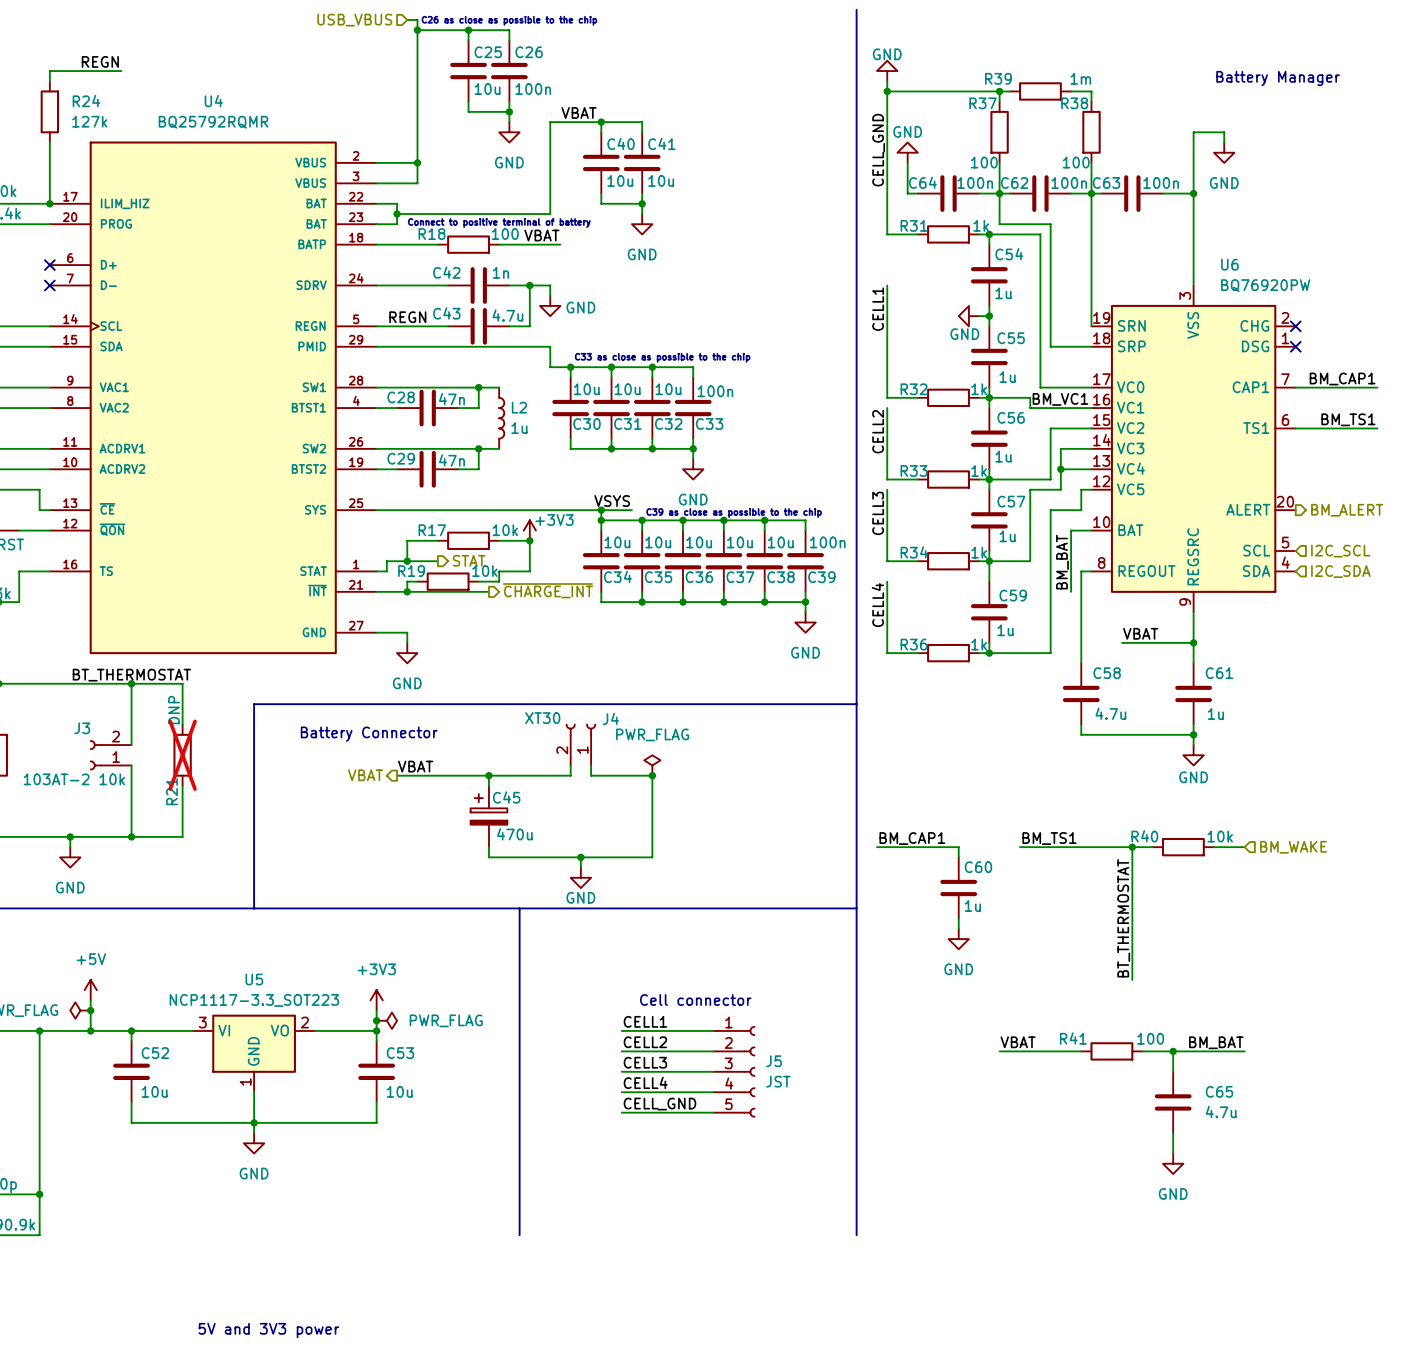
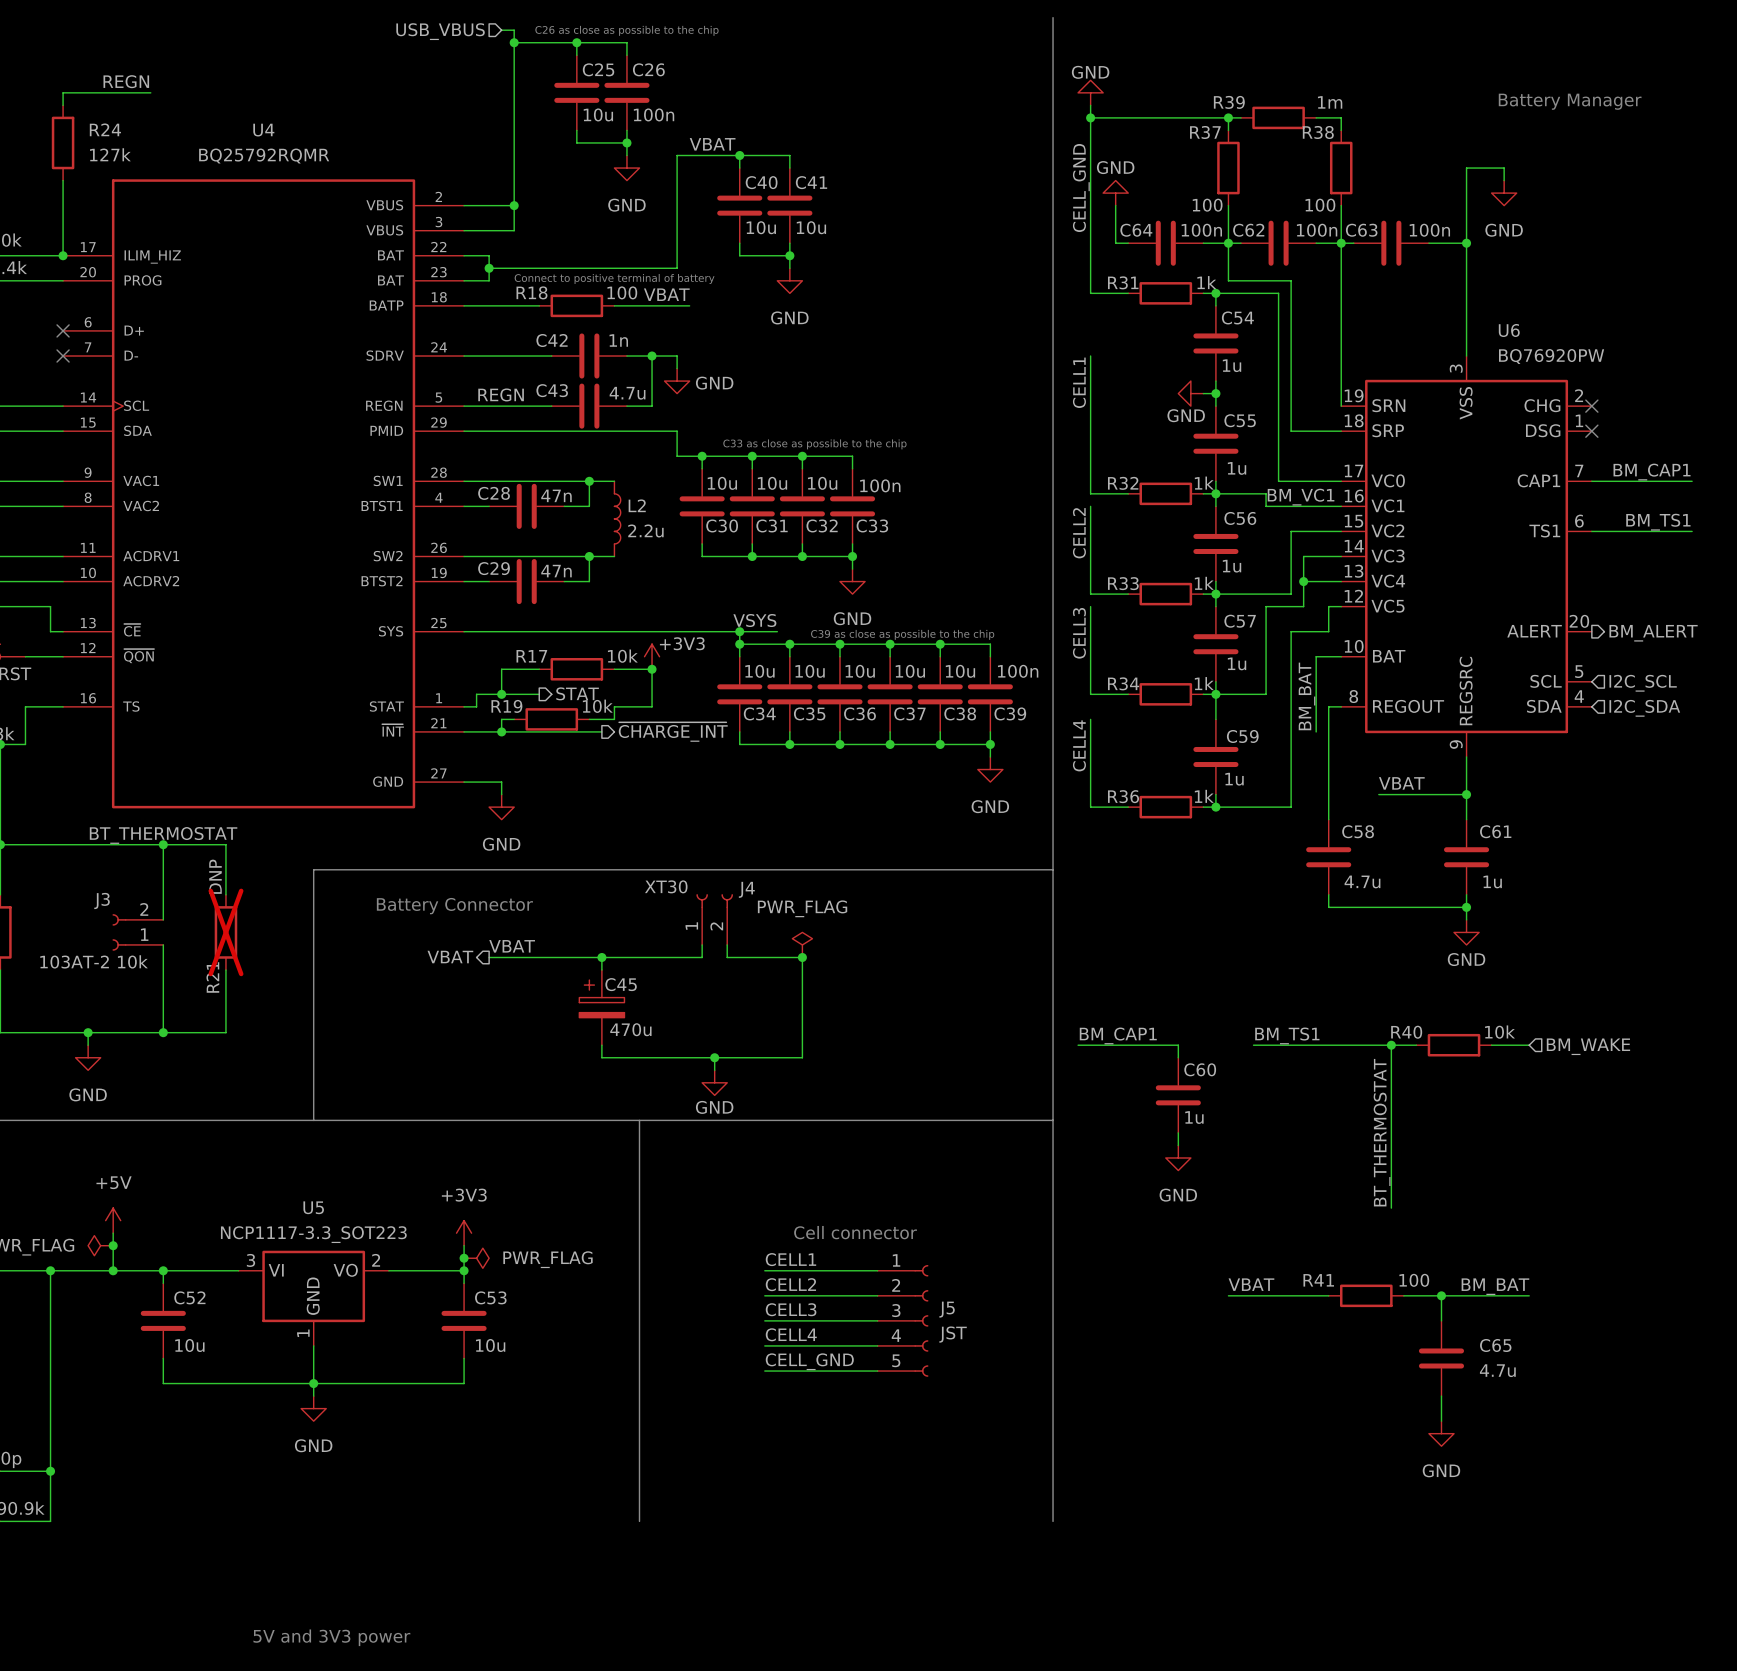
L2 value: 1u (519, 428) -> 2.2u (645, 530)
J4 flip: as is (580, 729) -> left-right (714, 901)

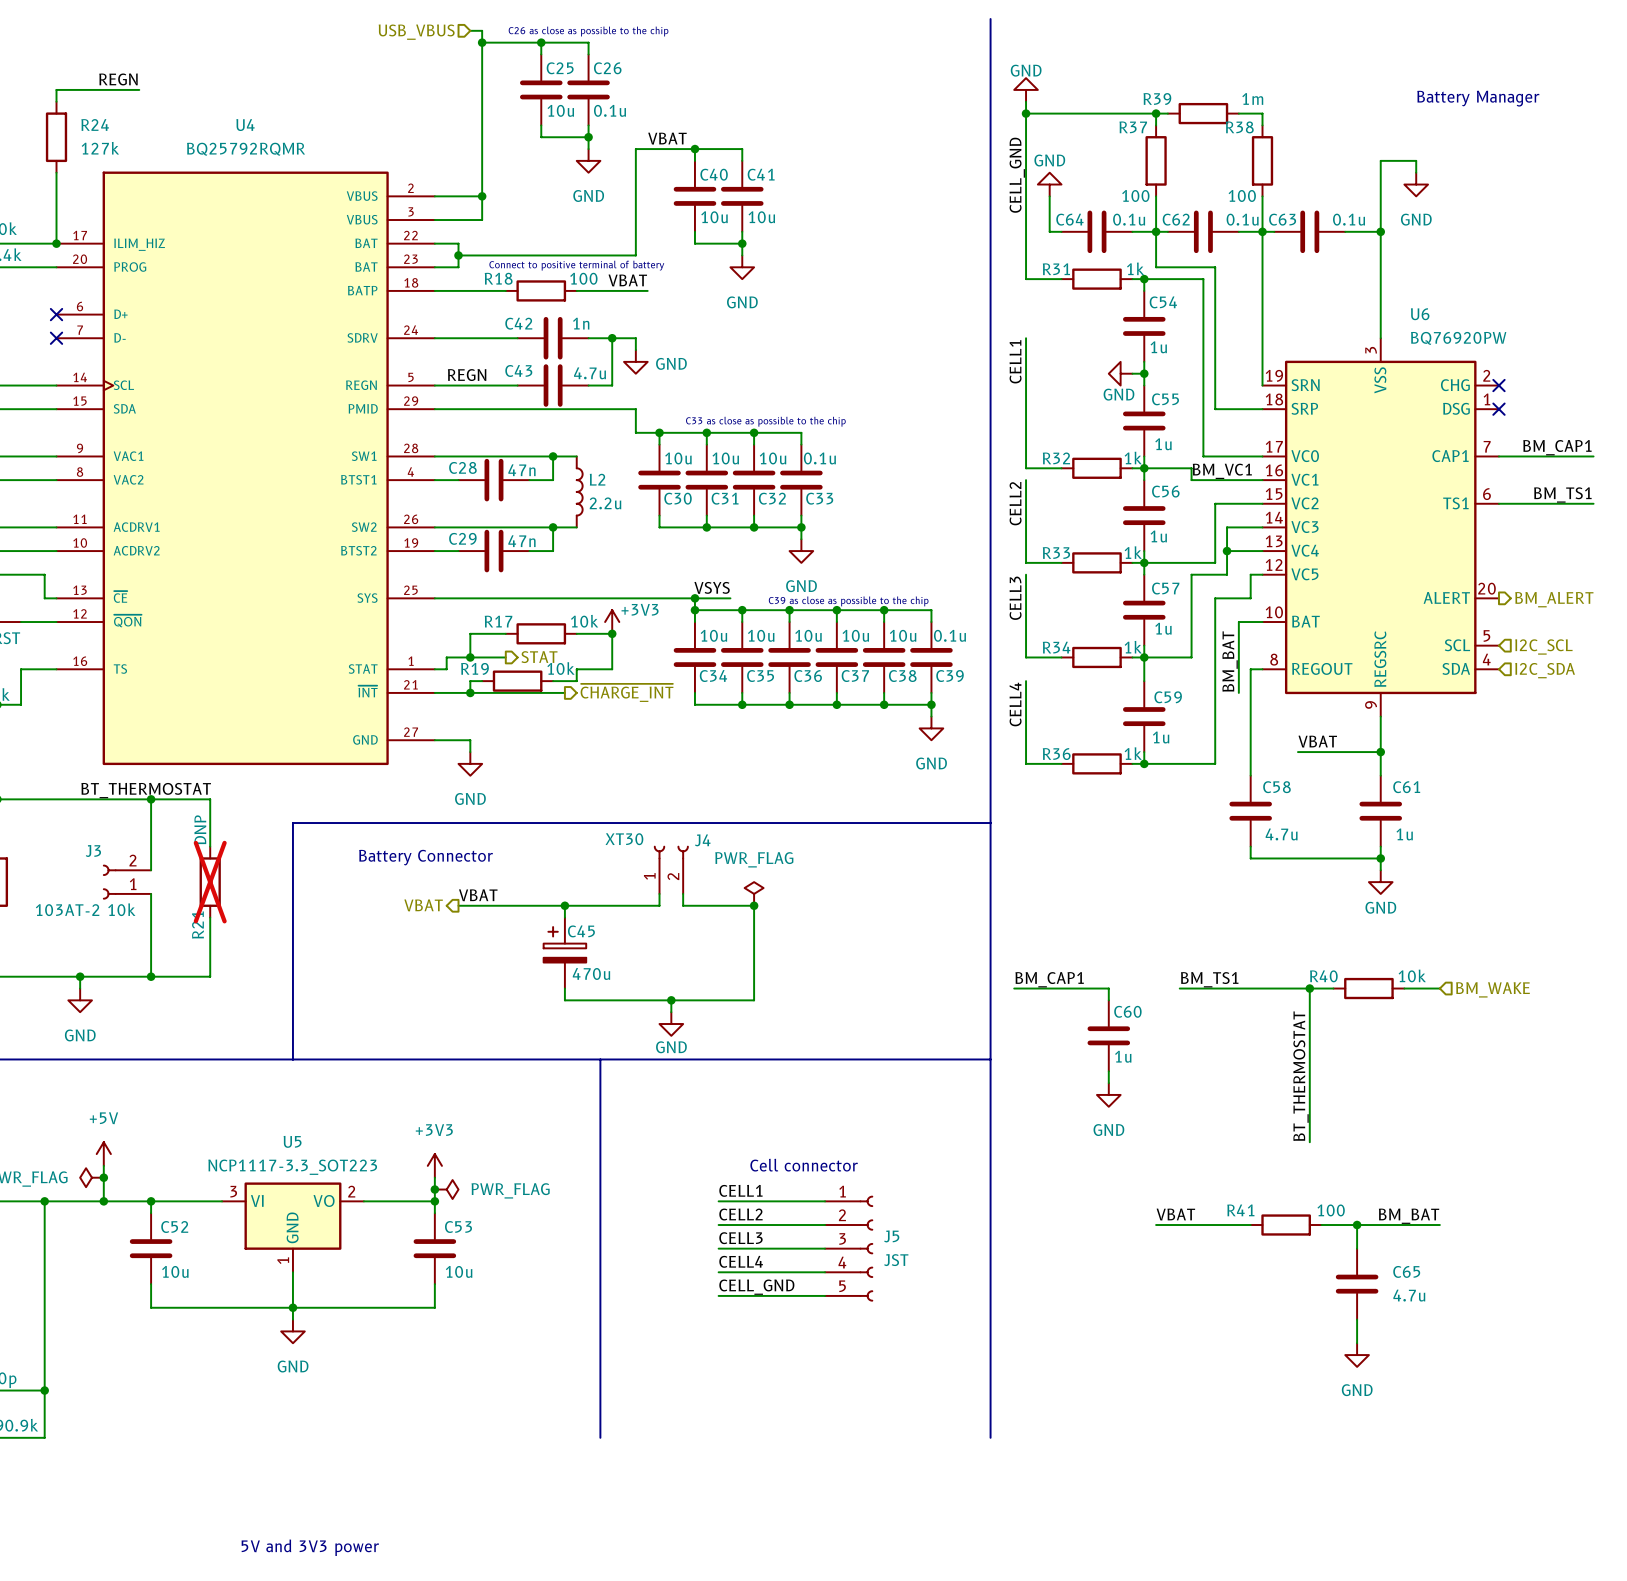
C26 value: 100n (654, 114) -> 0.1u (609, 110)
C64 value: 100n (1201, 230) -> 0.1u (1129, 219)
C62 value: 100n (1317, 230) -> 0.1u (1242, 219)
C63 value: 100n (1429, 230) -> 0.1u (1349, 219)
C33 value: 100n (880, 485) -> 0.1u (819, 458)
C39 value: 100n (1018, 671) -> 0.1u (949, 635)

